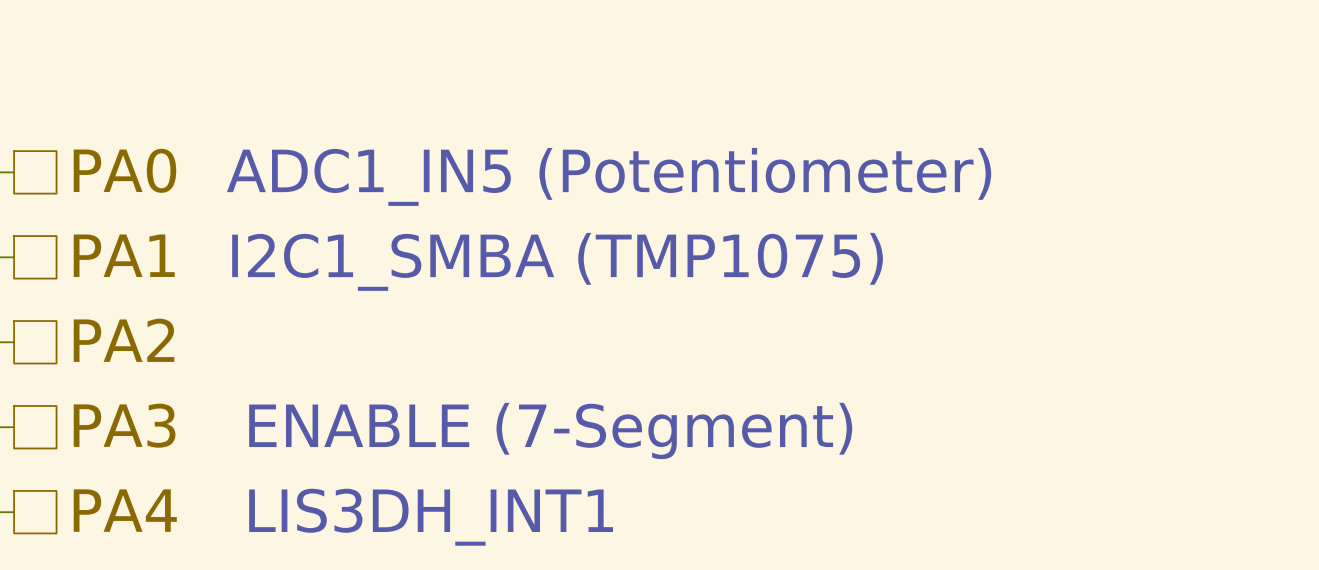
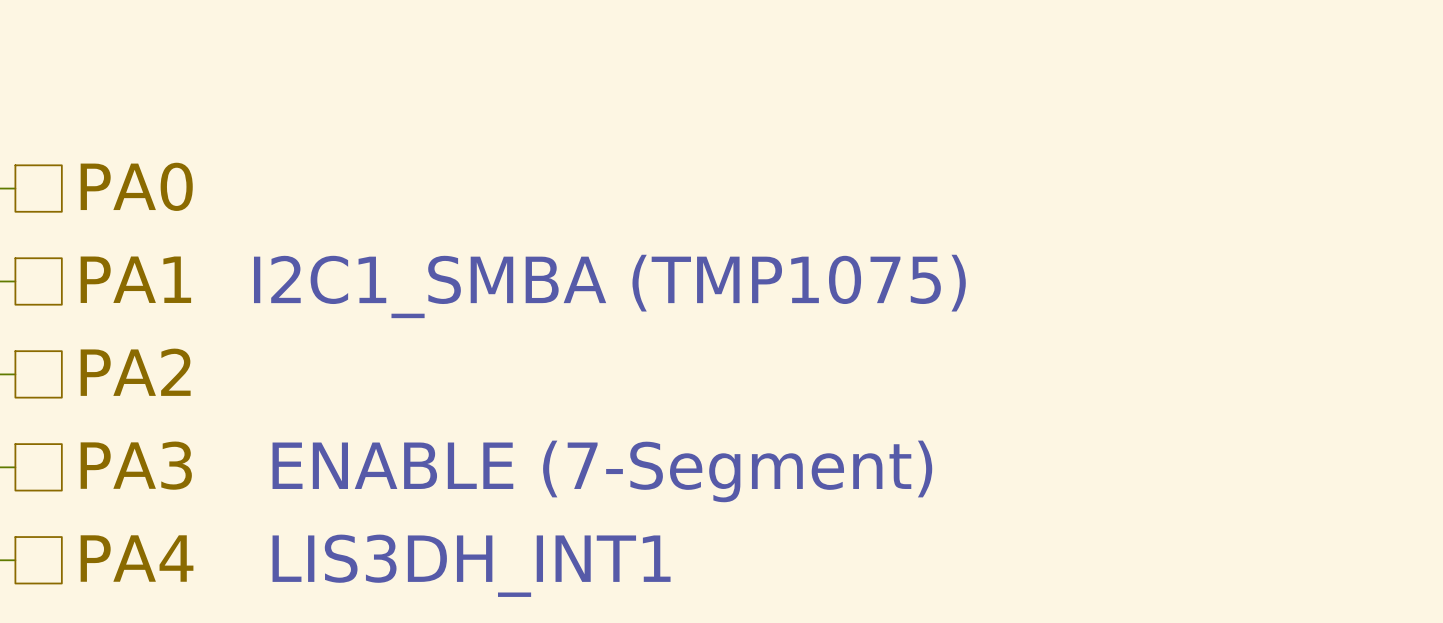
text: ADC1_IN5 (Potentiometer) (609, 176) -> none

